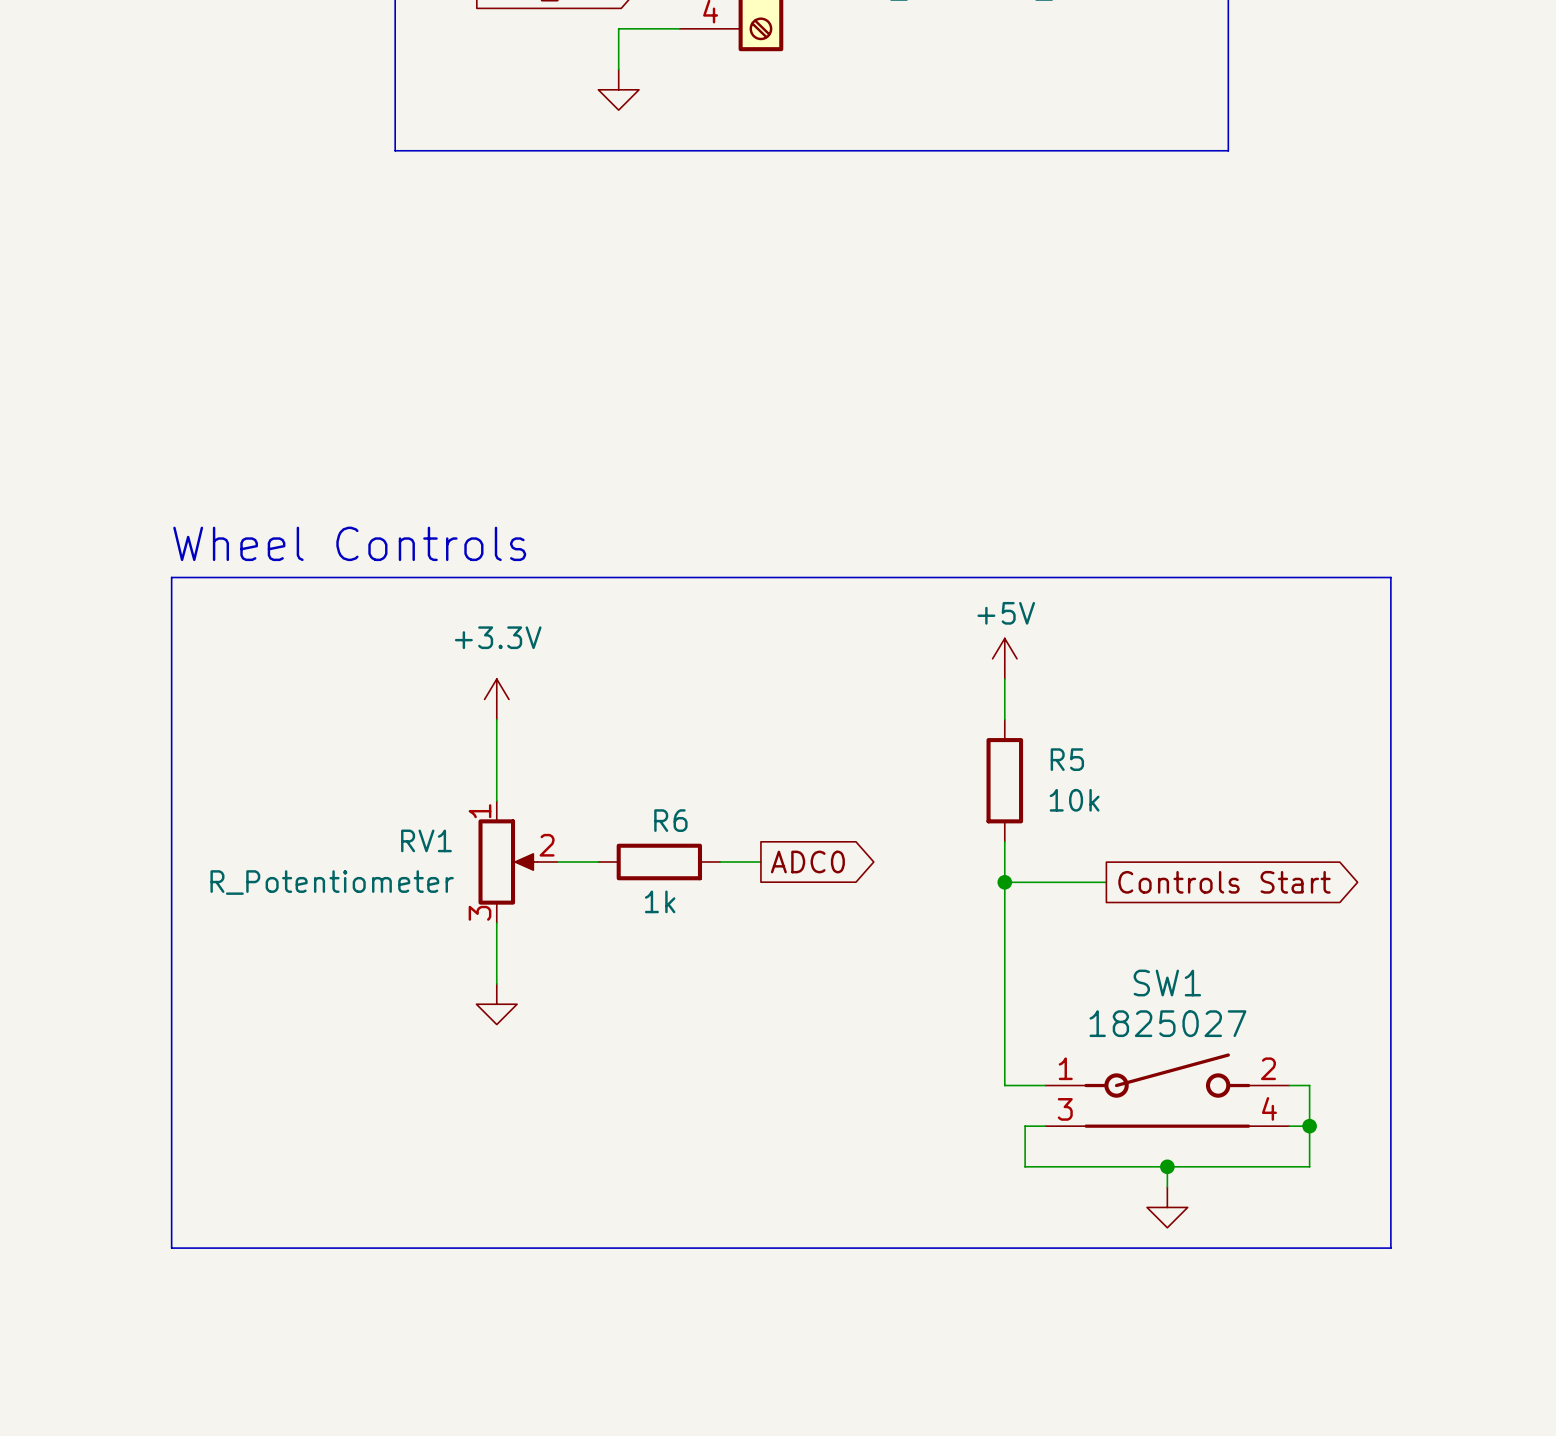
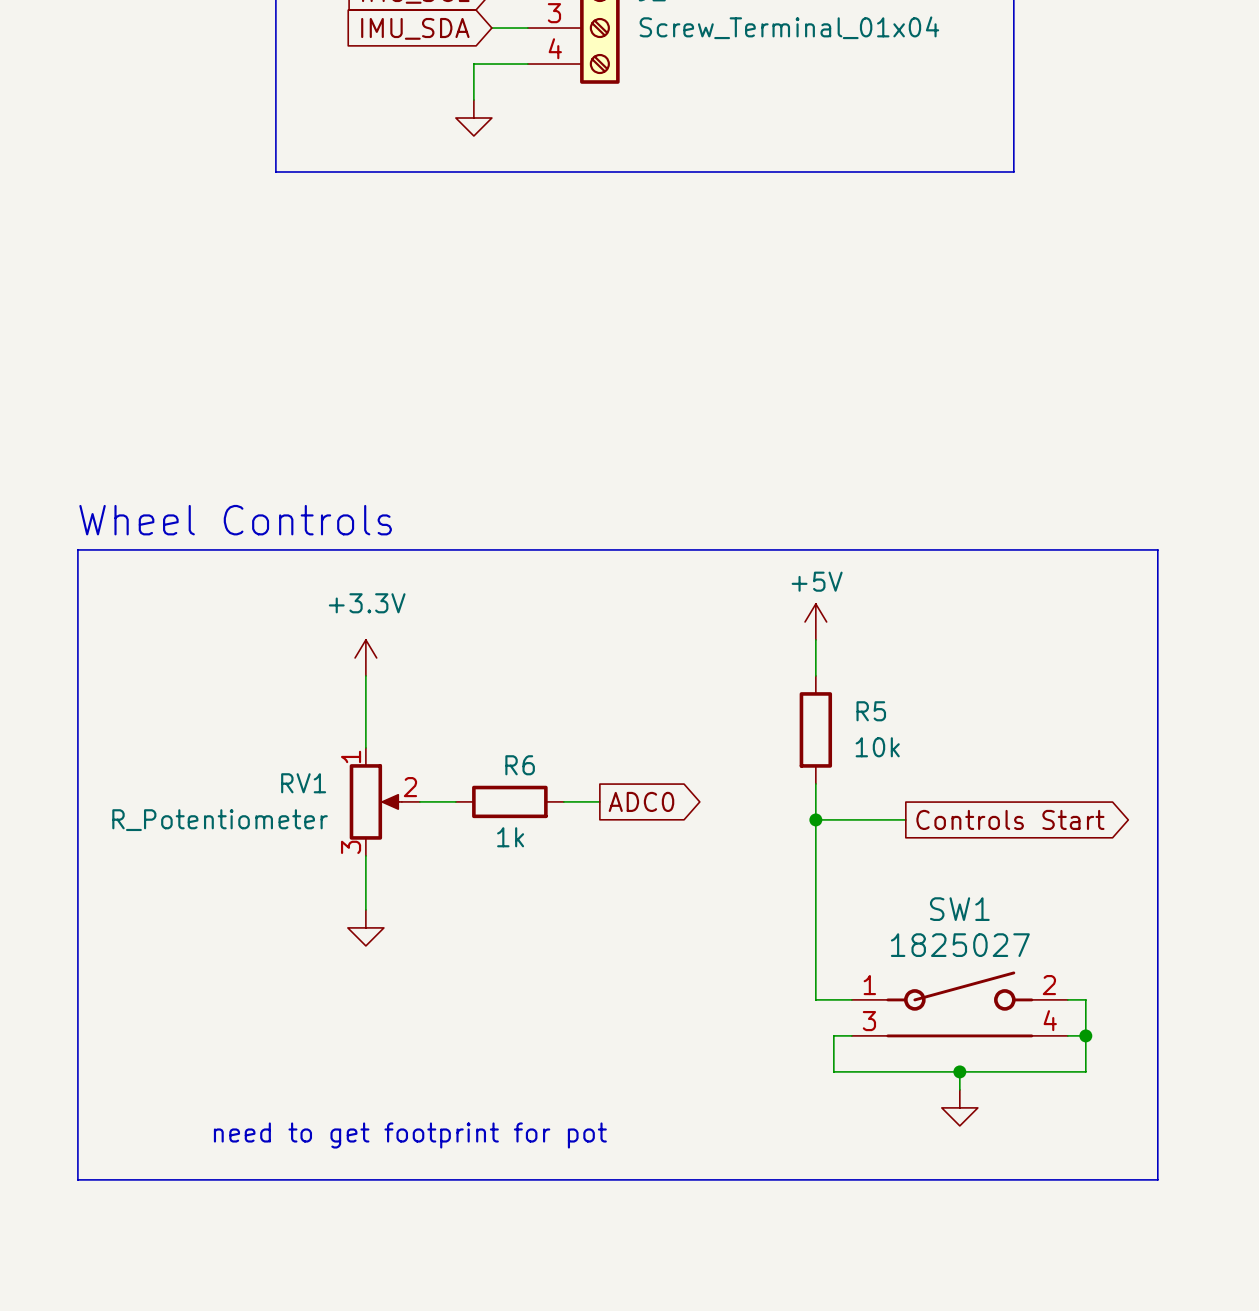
text: none -> need to get footprint for pot (410, 1135)
line: (171, 1248) (1390, 1248) -> (77, 1143) (77, 1179) (1157, 1179) (1157, 1143)

